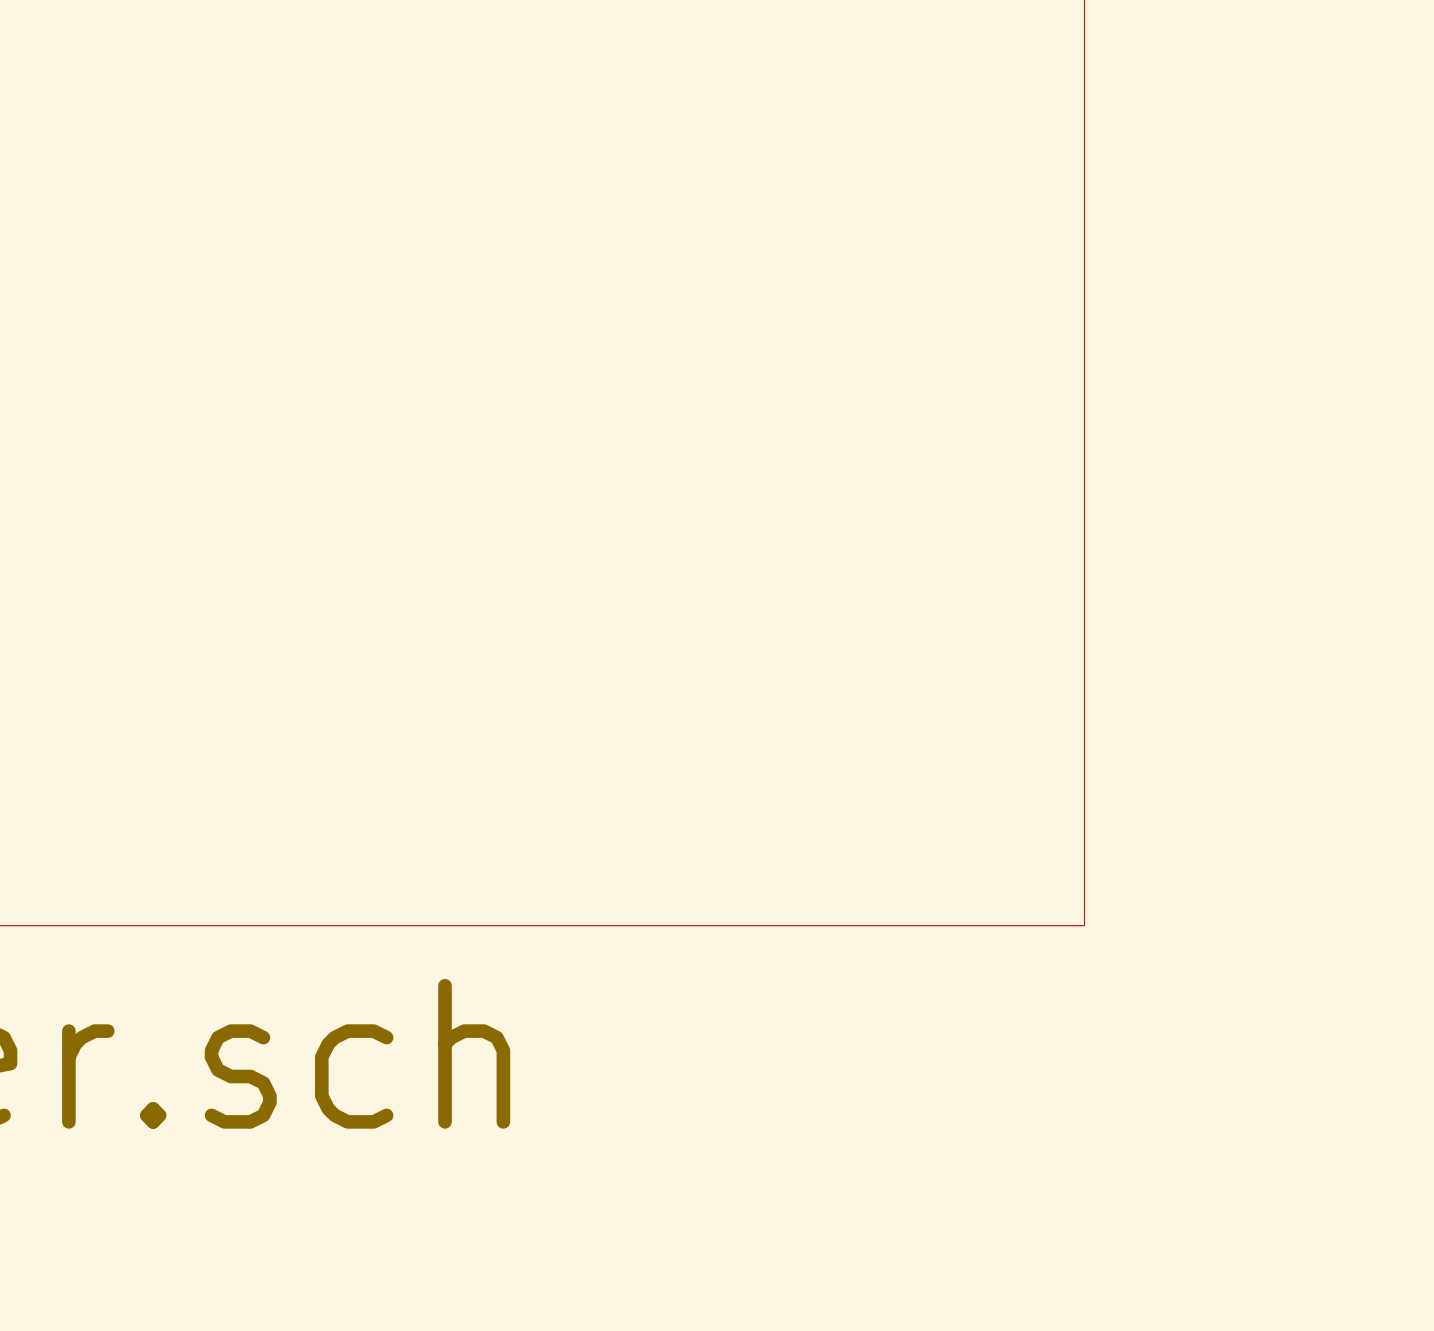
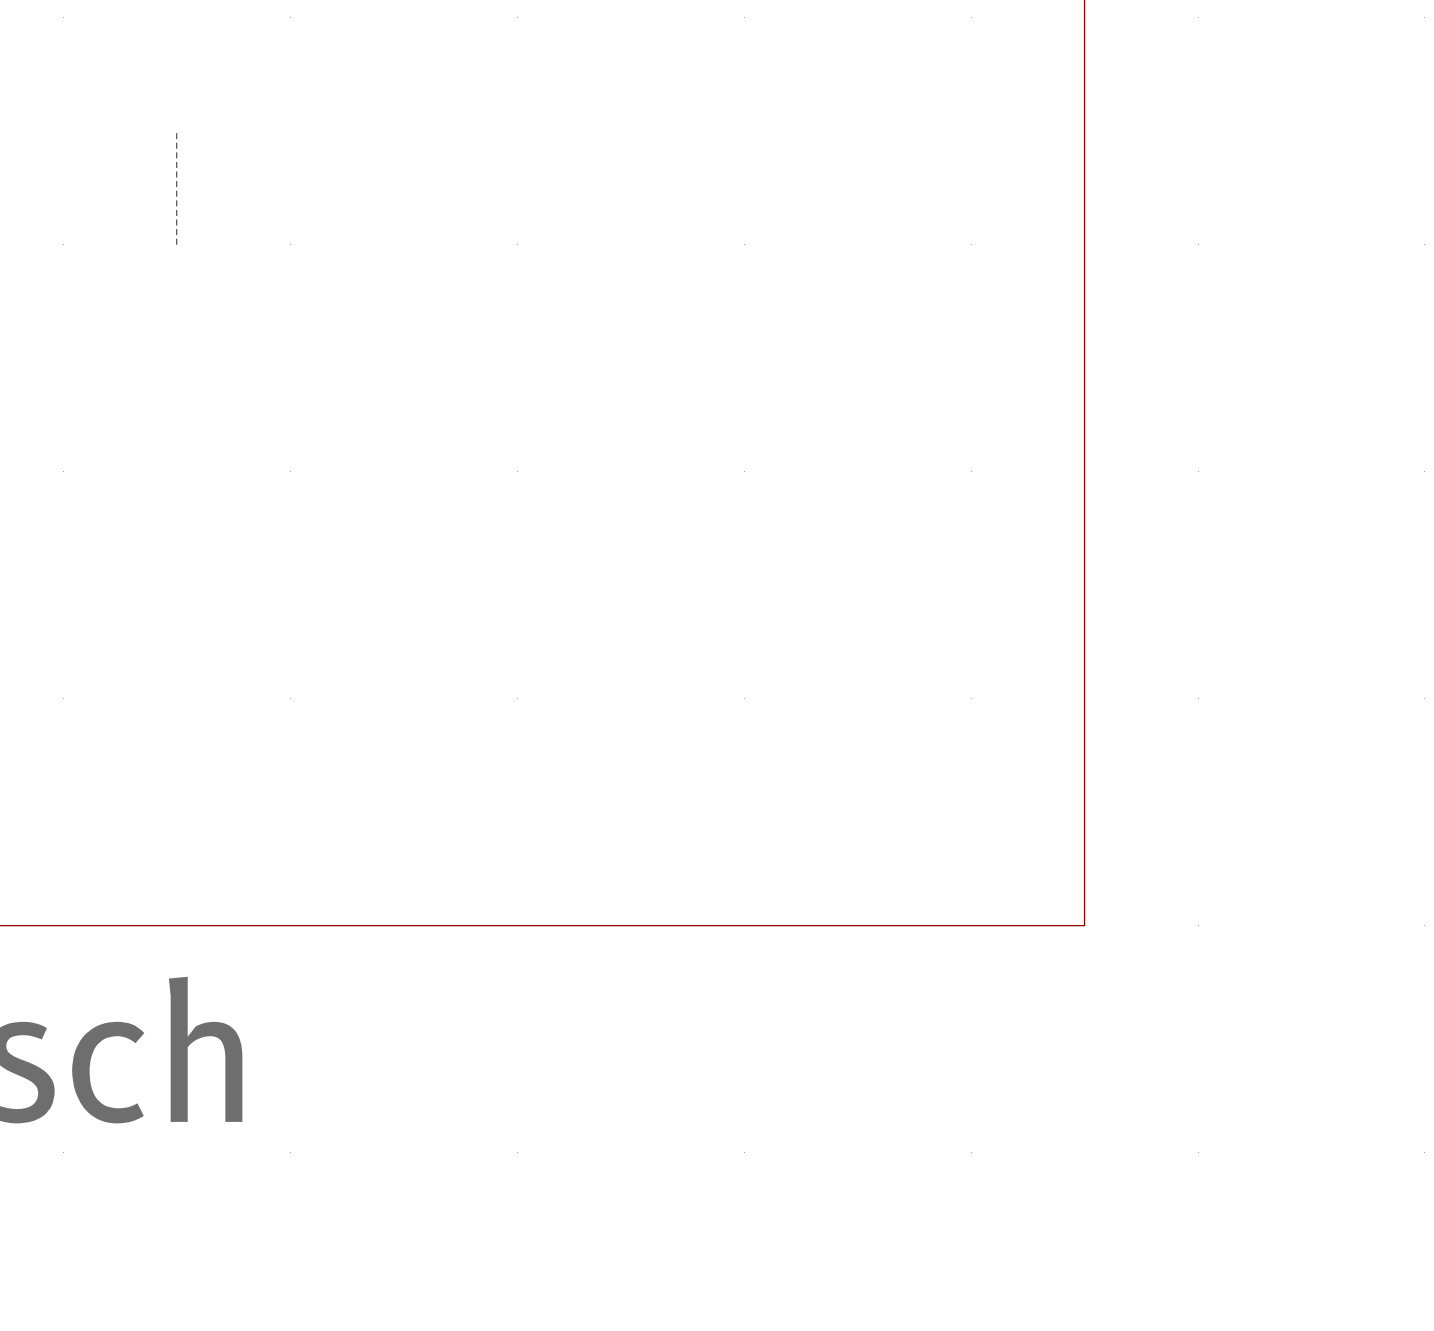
line: none -> (176, 131) (176, 244)

